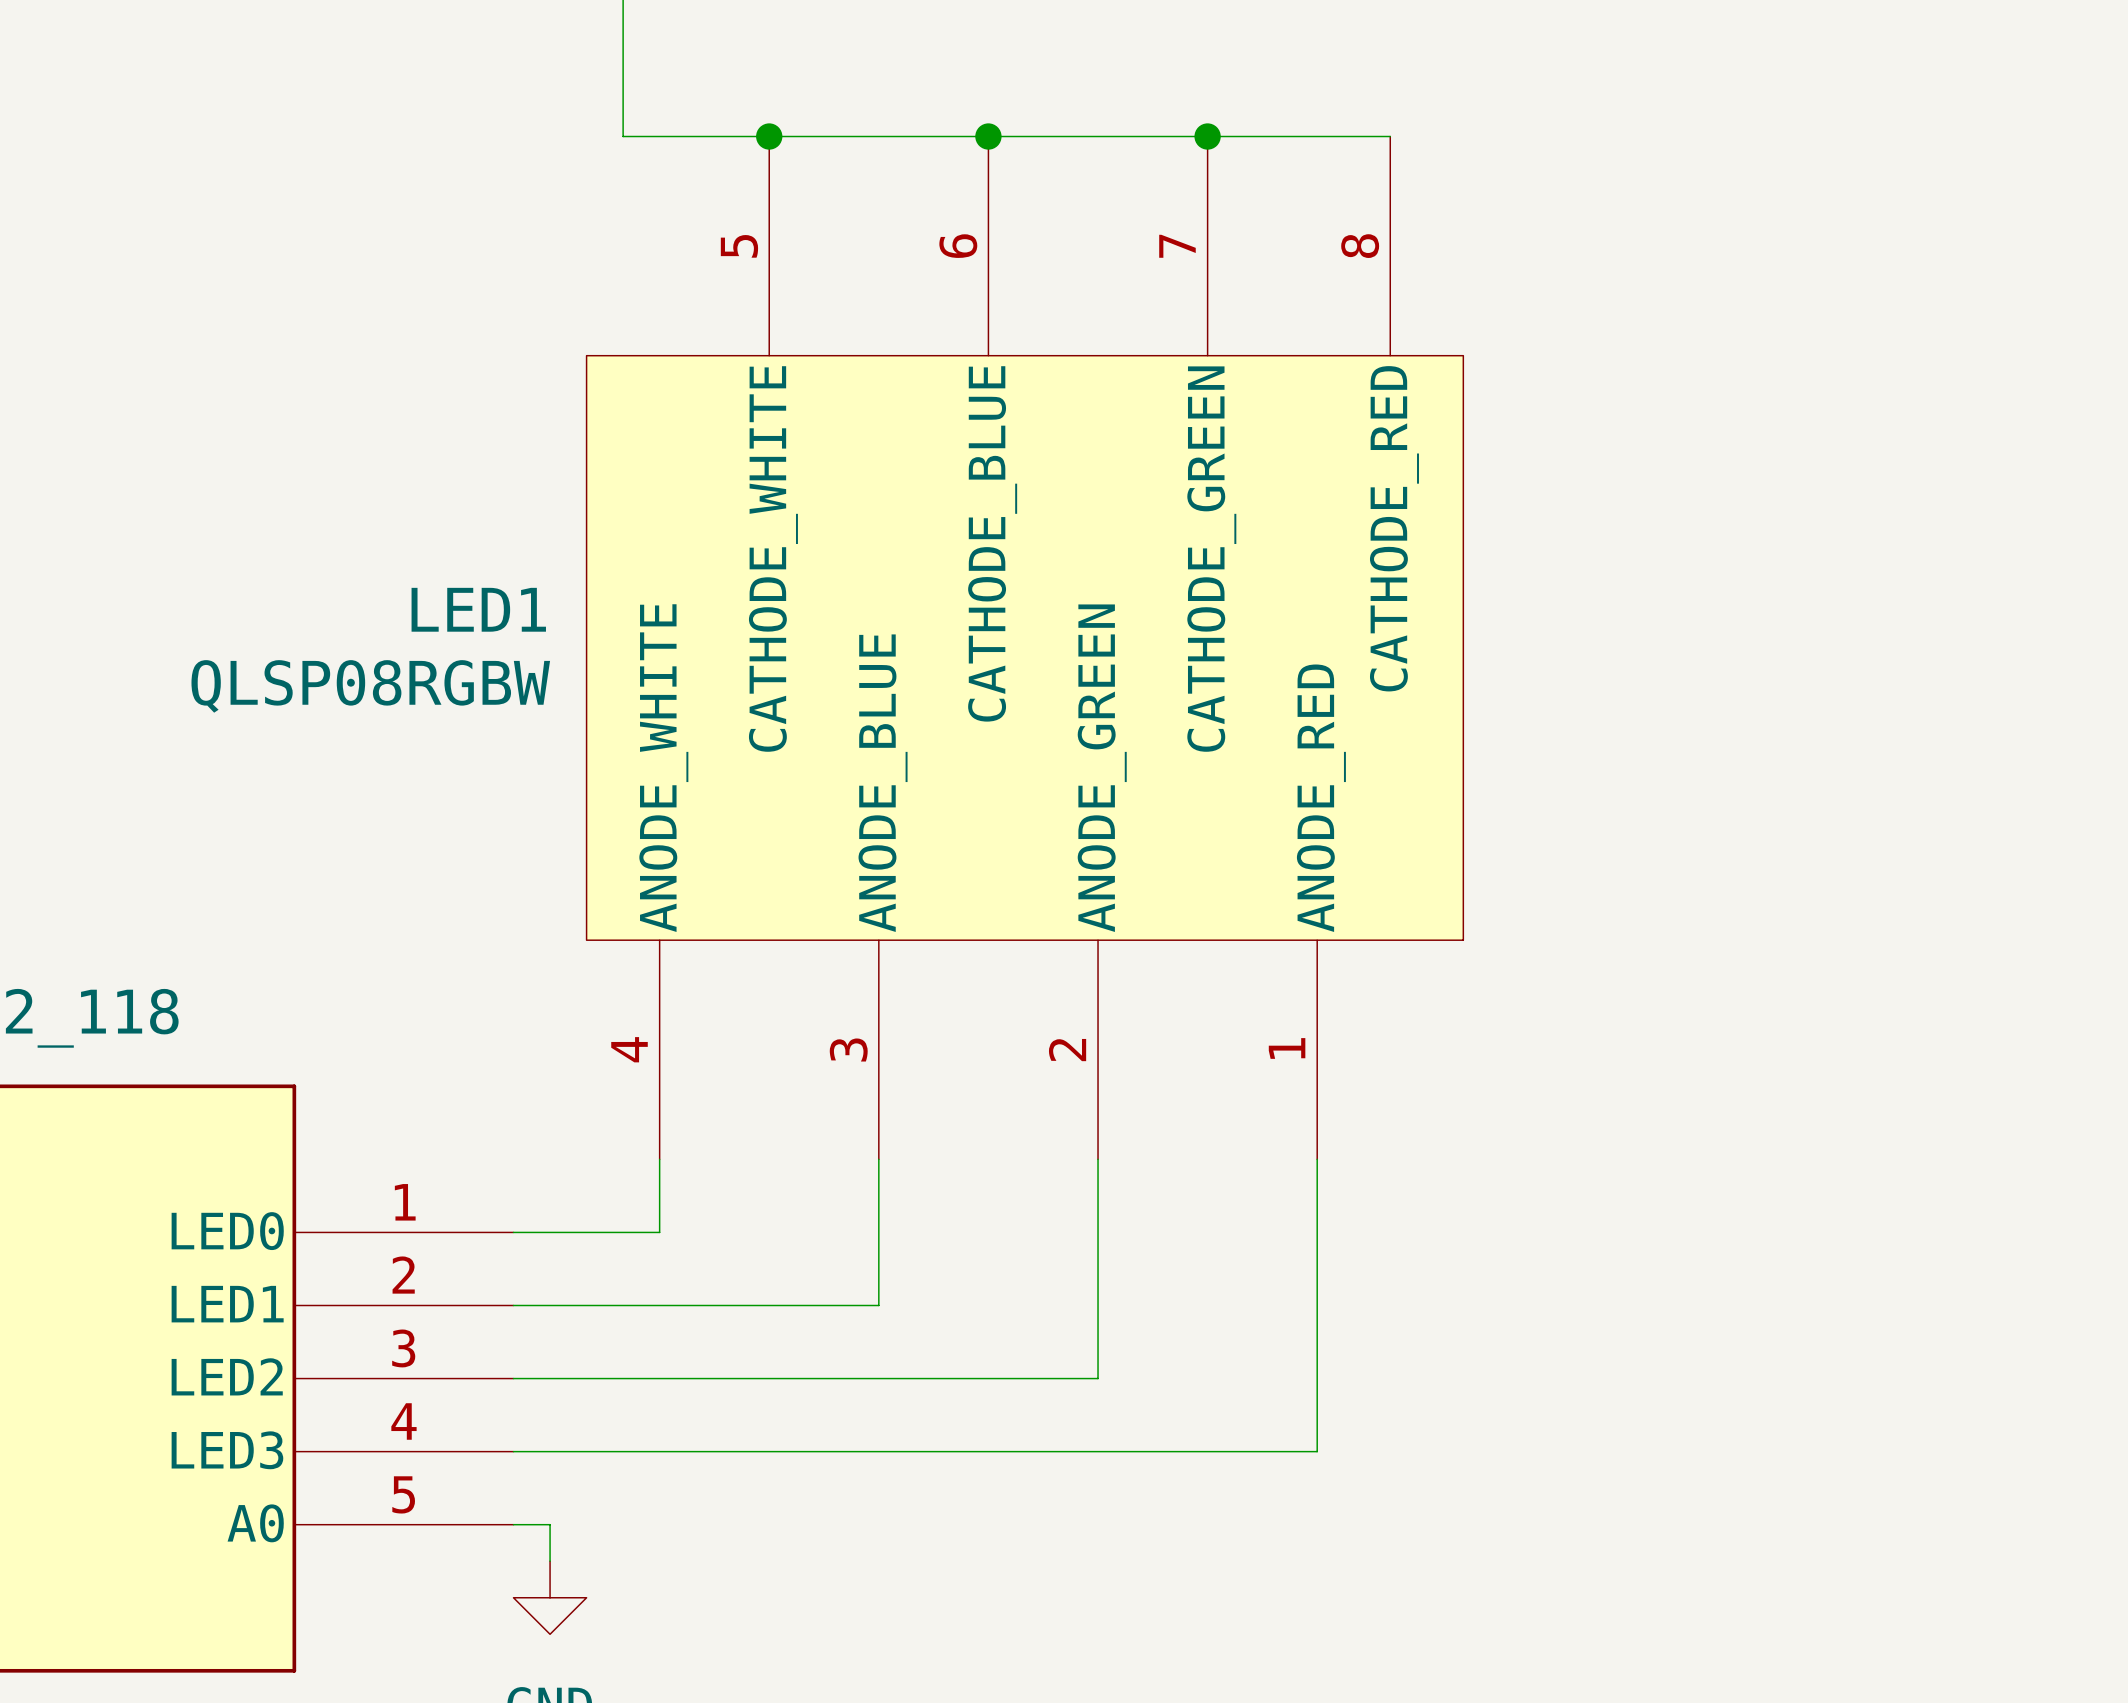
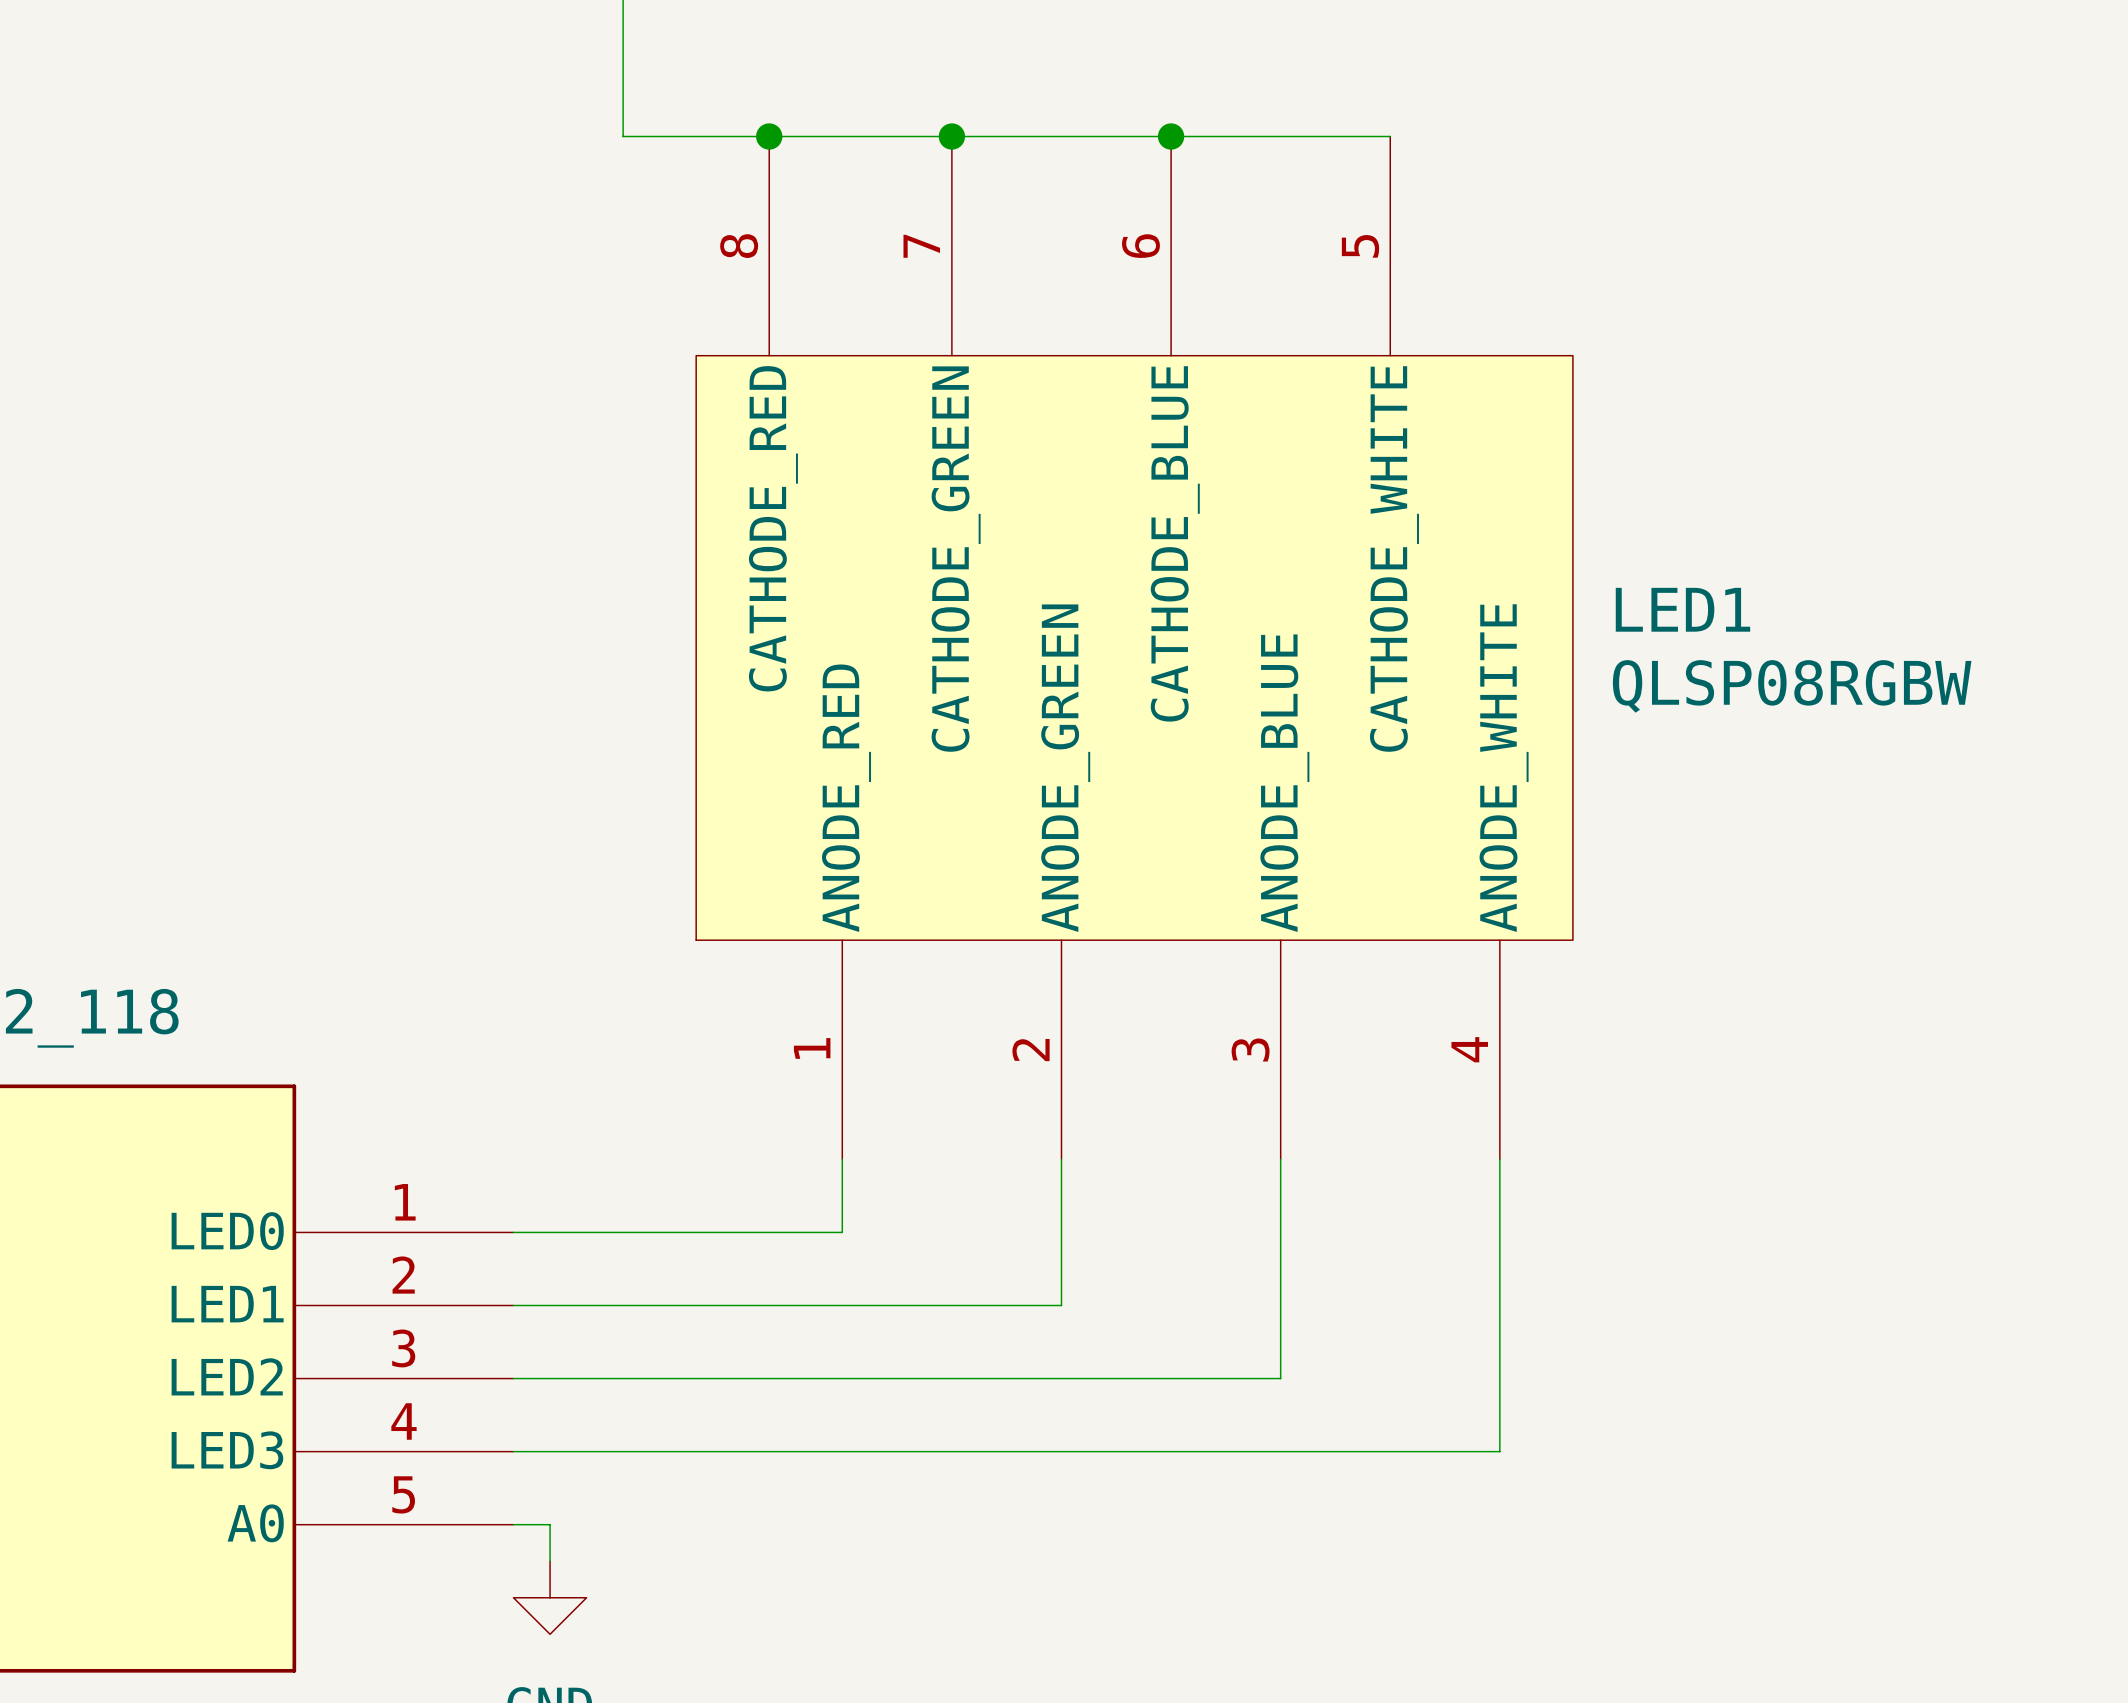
junction position: (988, 136) -> (951, 136)
junction position: (1207, 136) -> (1171, 136)
LED1 flip: as is (1024, 647) -> left-right (1134, 647)
wire: (659, 1159) (659, 1232) -> (842, 1159) (842, 1232) (659, 1232)
wire: (878, 1159) (878, 1305) -> (1061, 1159) (1061, 1305) (878, 1305)
wire: (1098, 1159) (1098, 1378) -> (1280, 1159) (1280, 1378) (1098, 1378)
wire: (1317, 1159) (1317, 1451) -> (1499, 1159) (1499, 1451) (1317, 1451)

